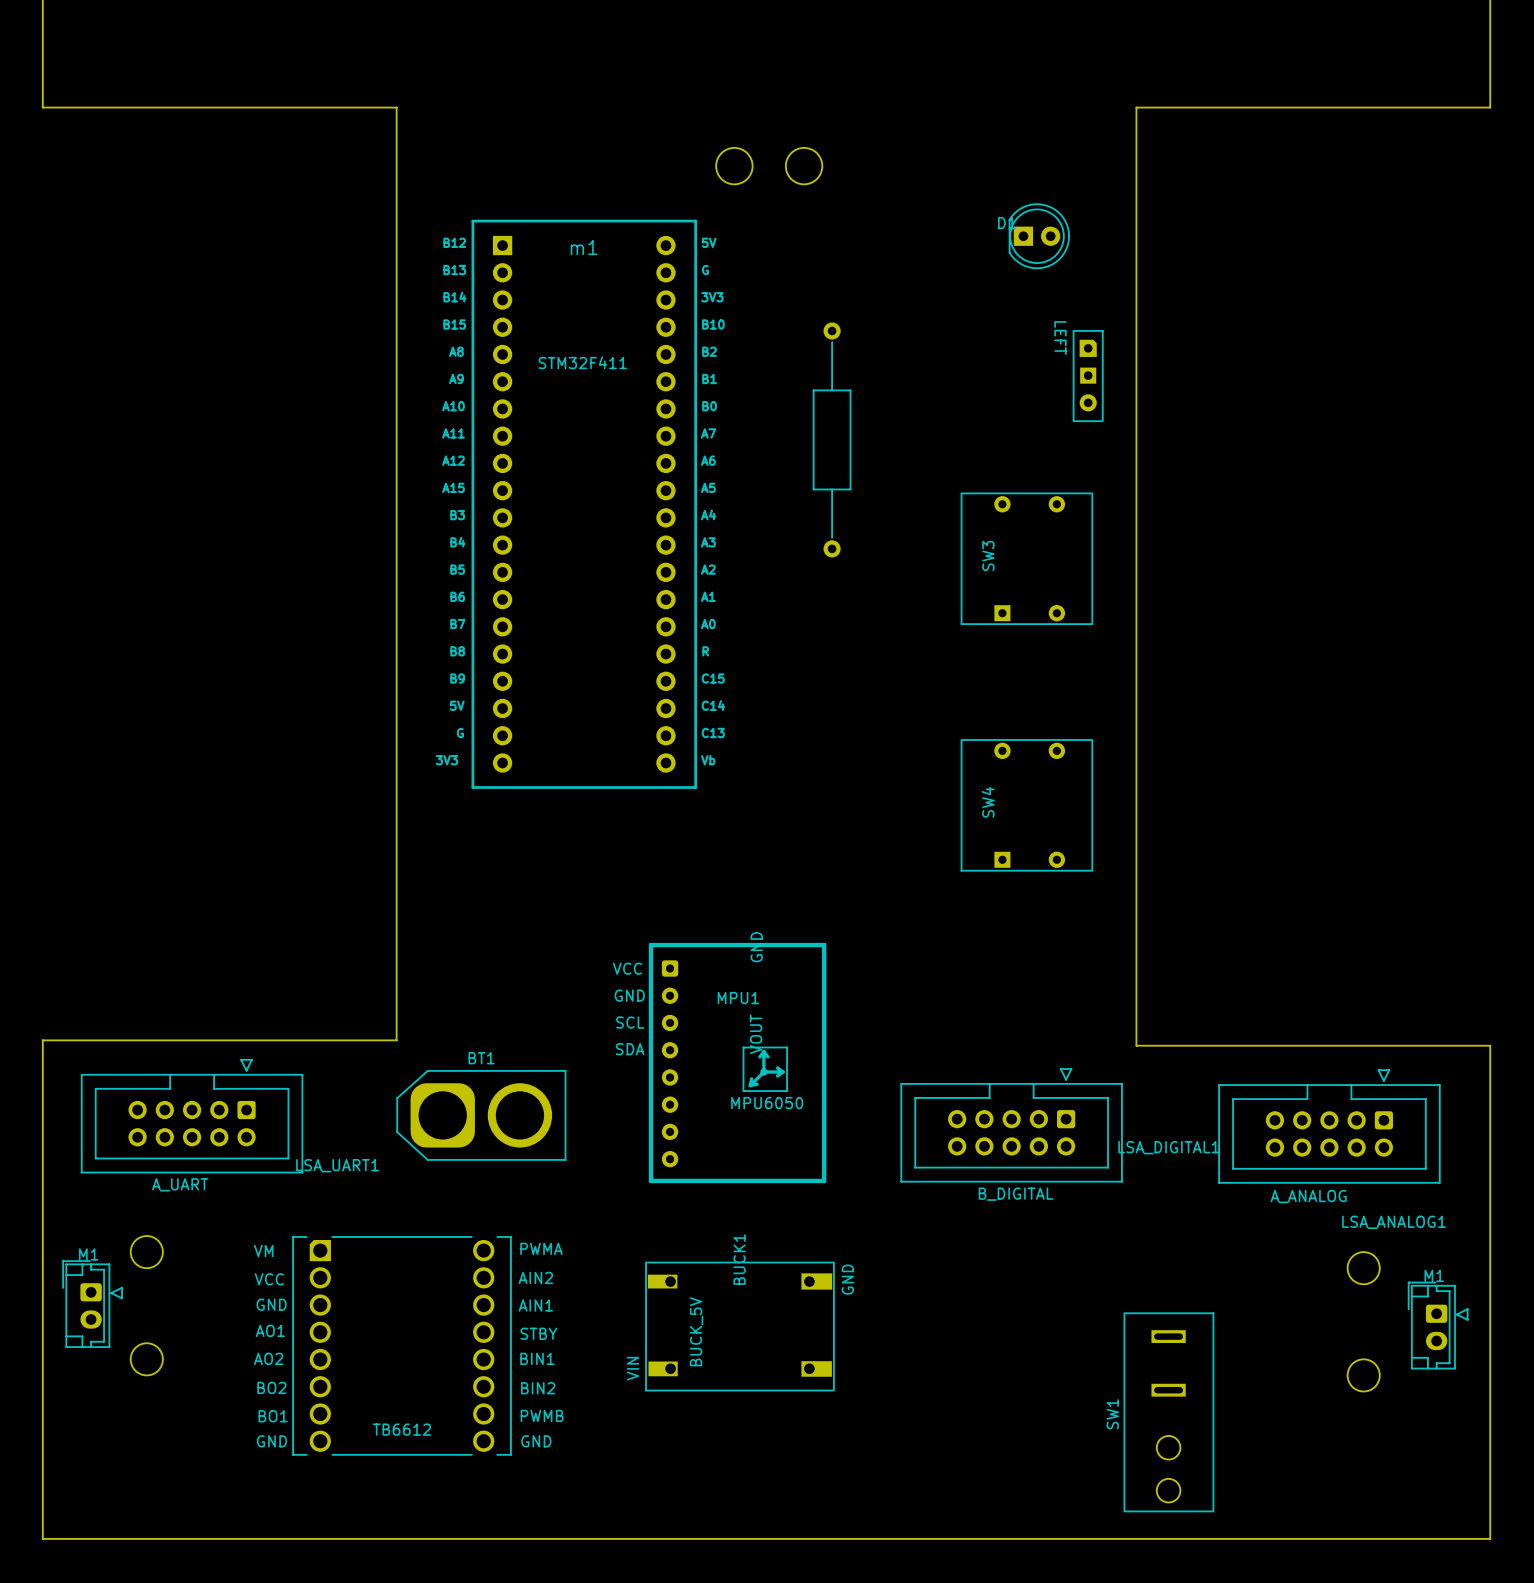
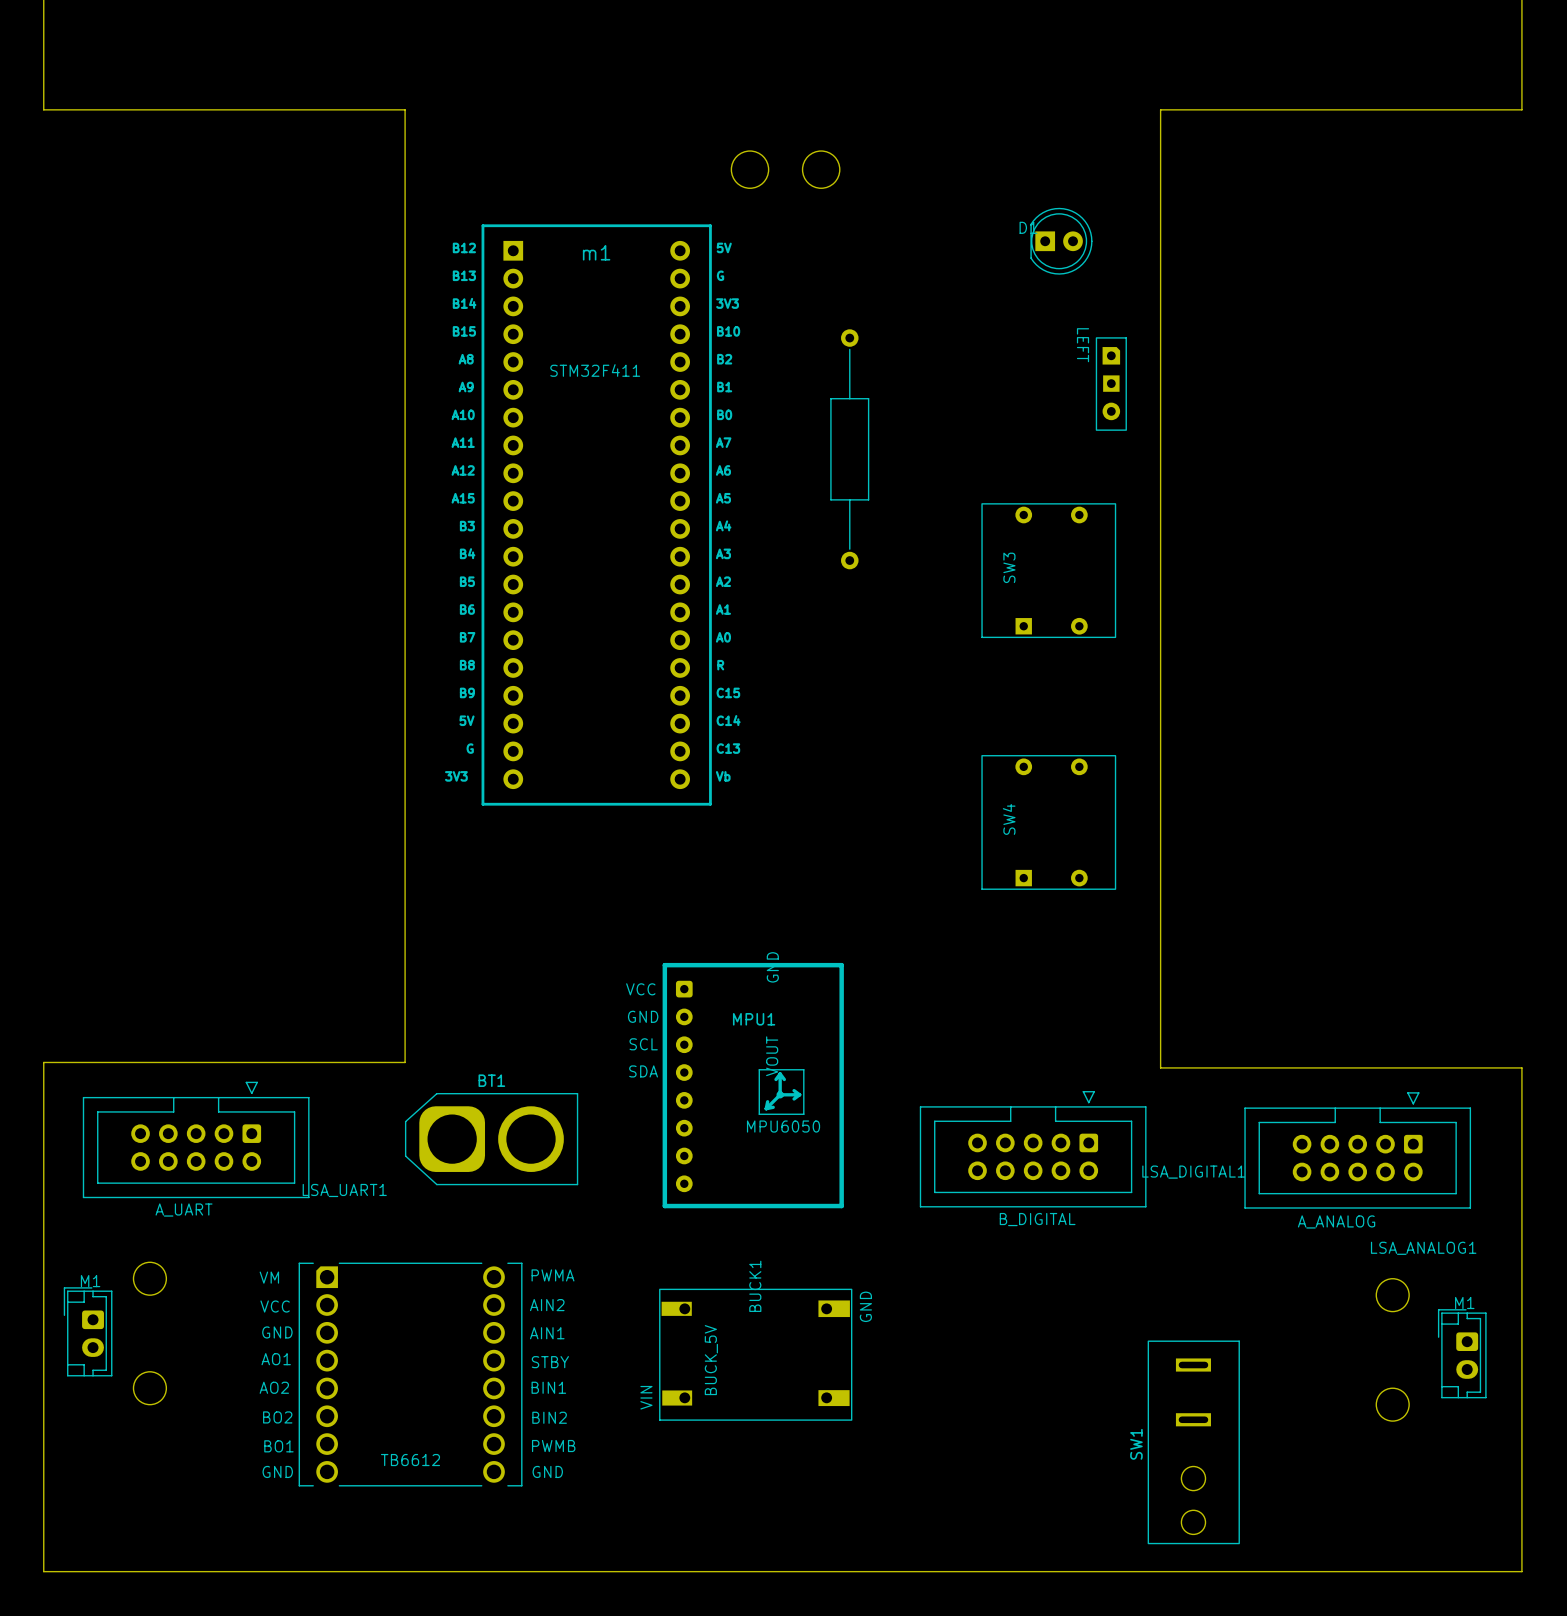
part footprint: [62, 1260, 123, 1348] -> [63, 1287, 113, 1377]
part footprint: [1408, 1281, 1469, 1370] -> [1437, 1309, 1487, 1399]

